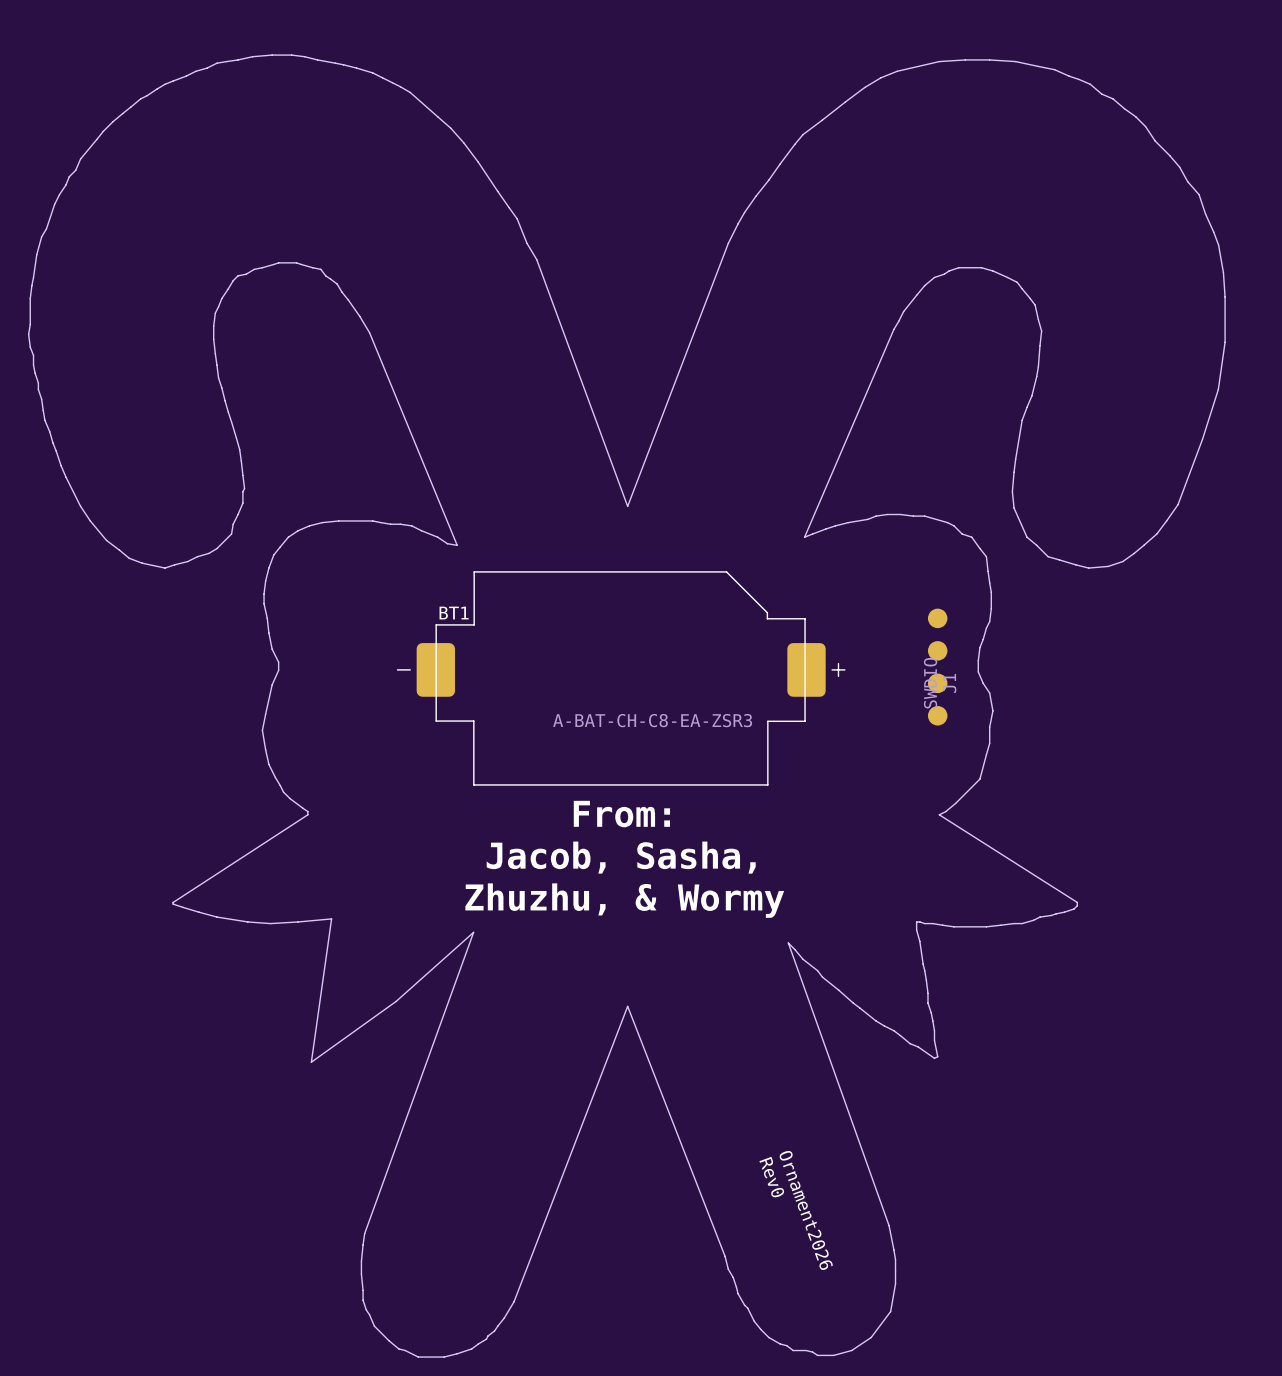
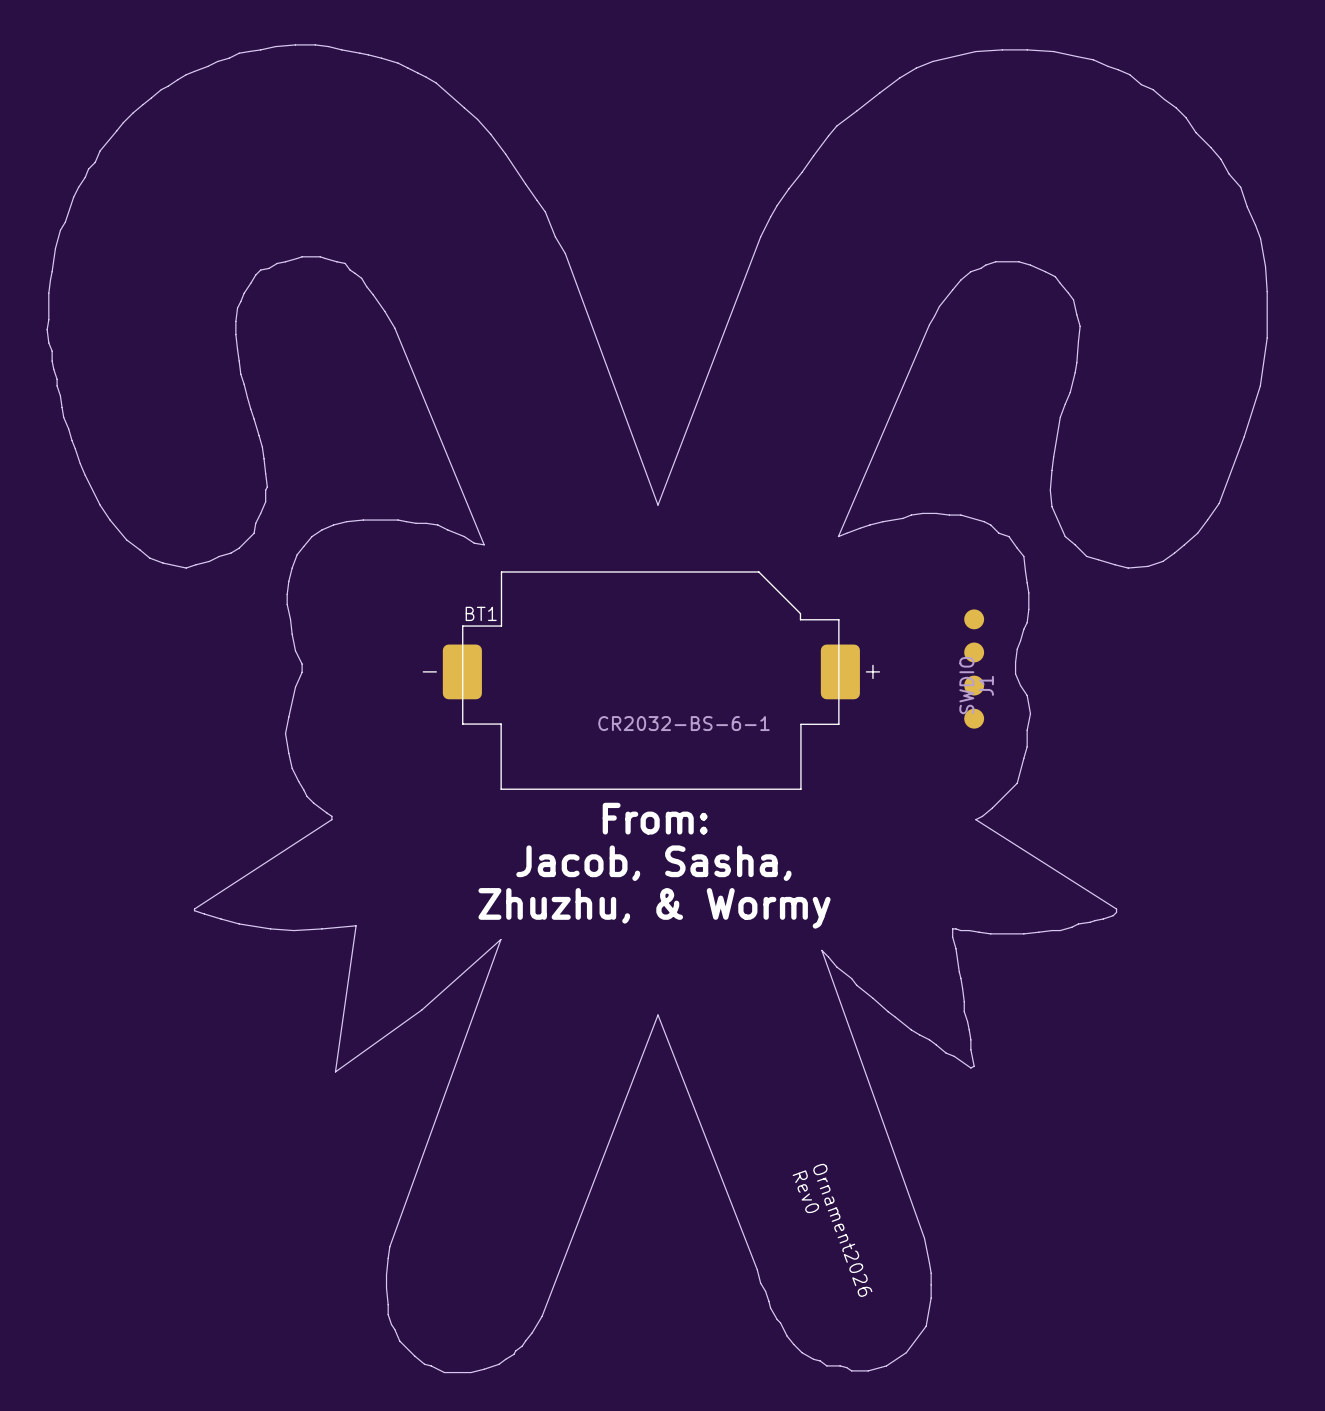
BT1 value: A-BAT-CH-C8-EA-ZSR3 (652, 720) -> CR2032-BS-6-1 (683, 723)

